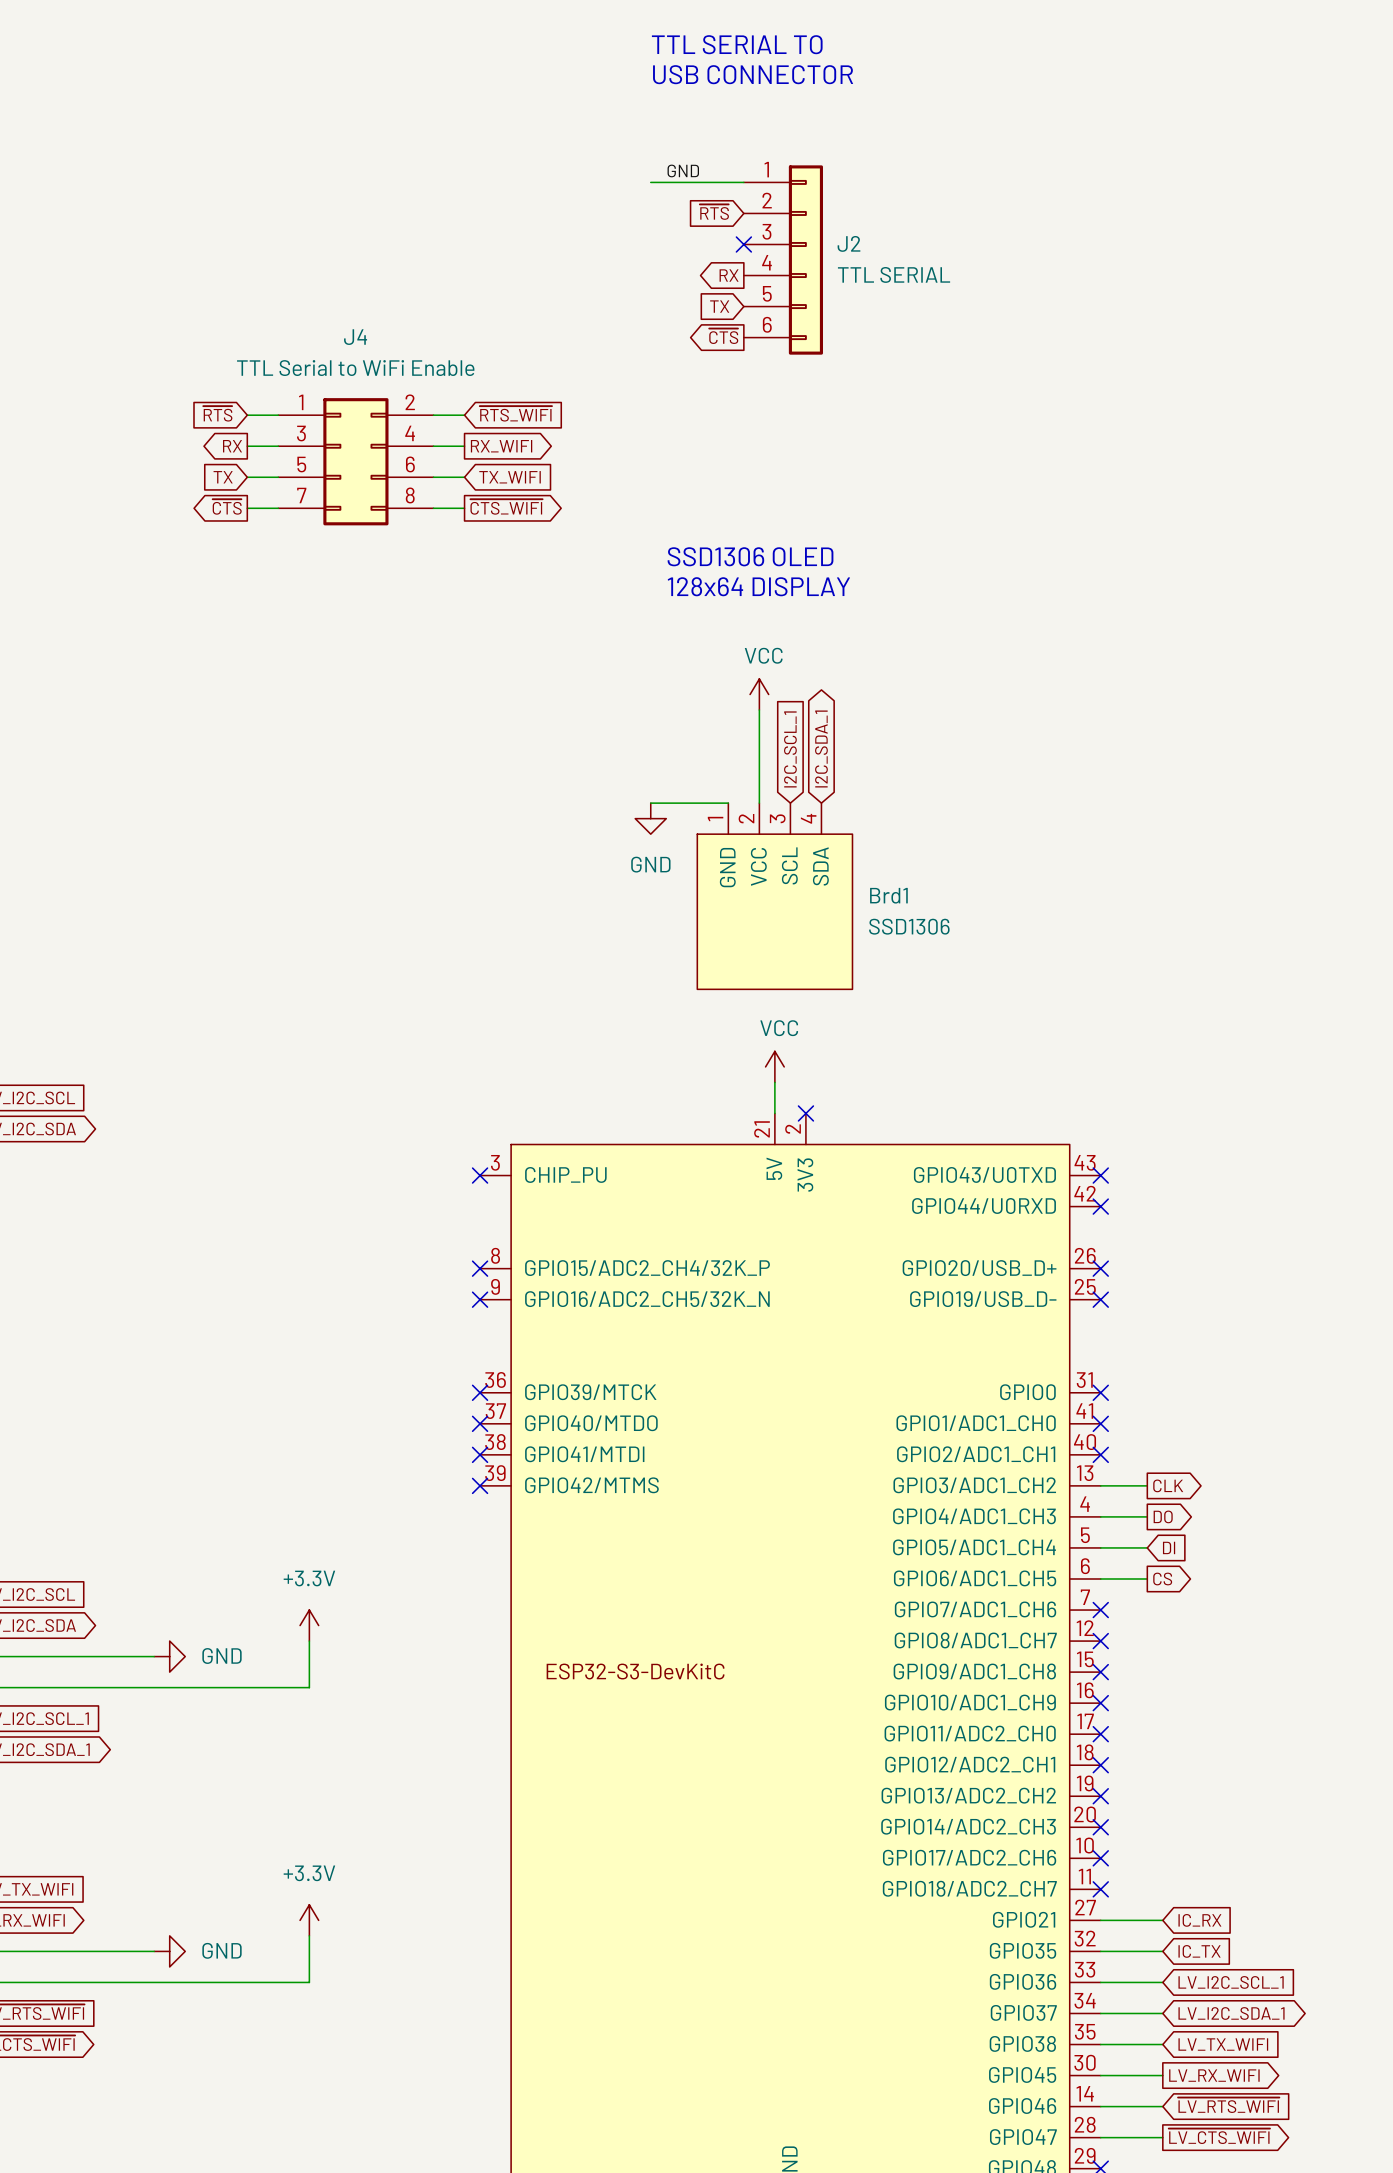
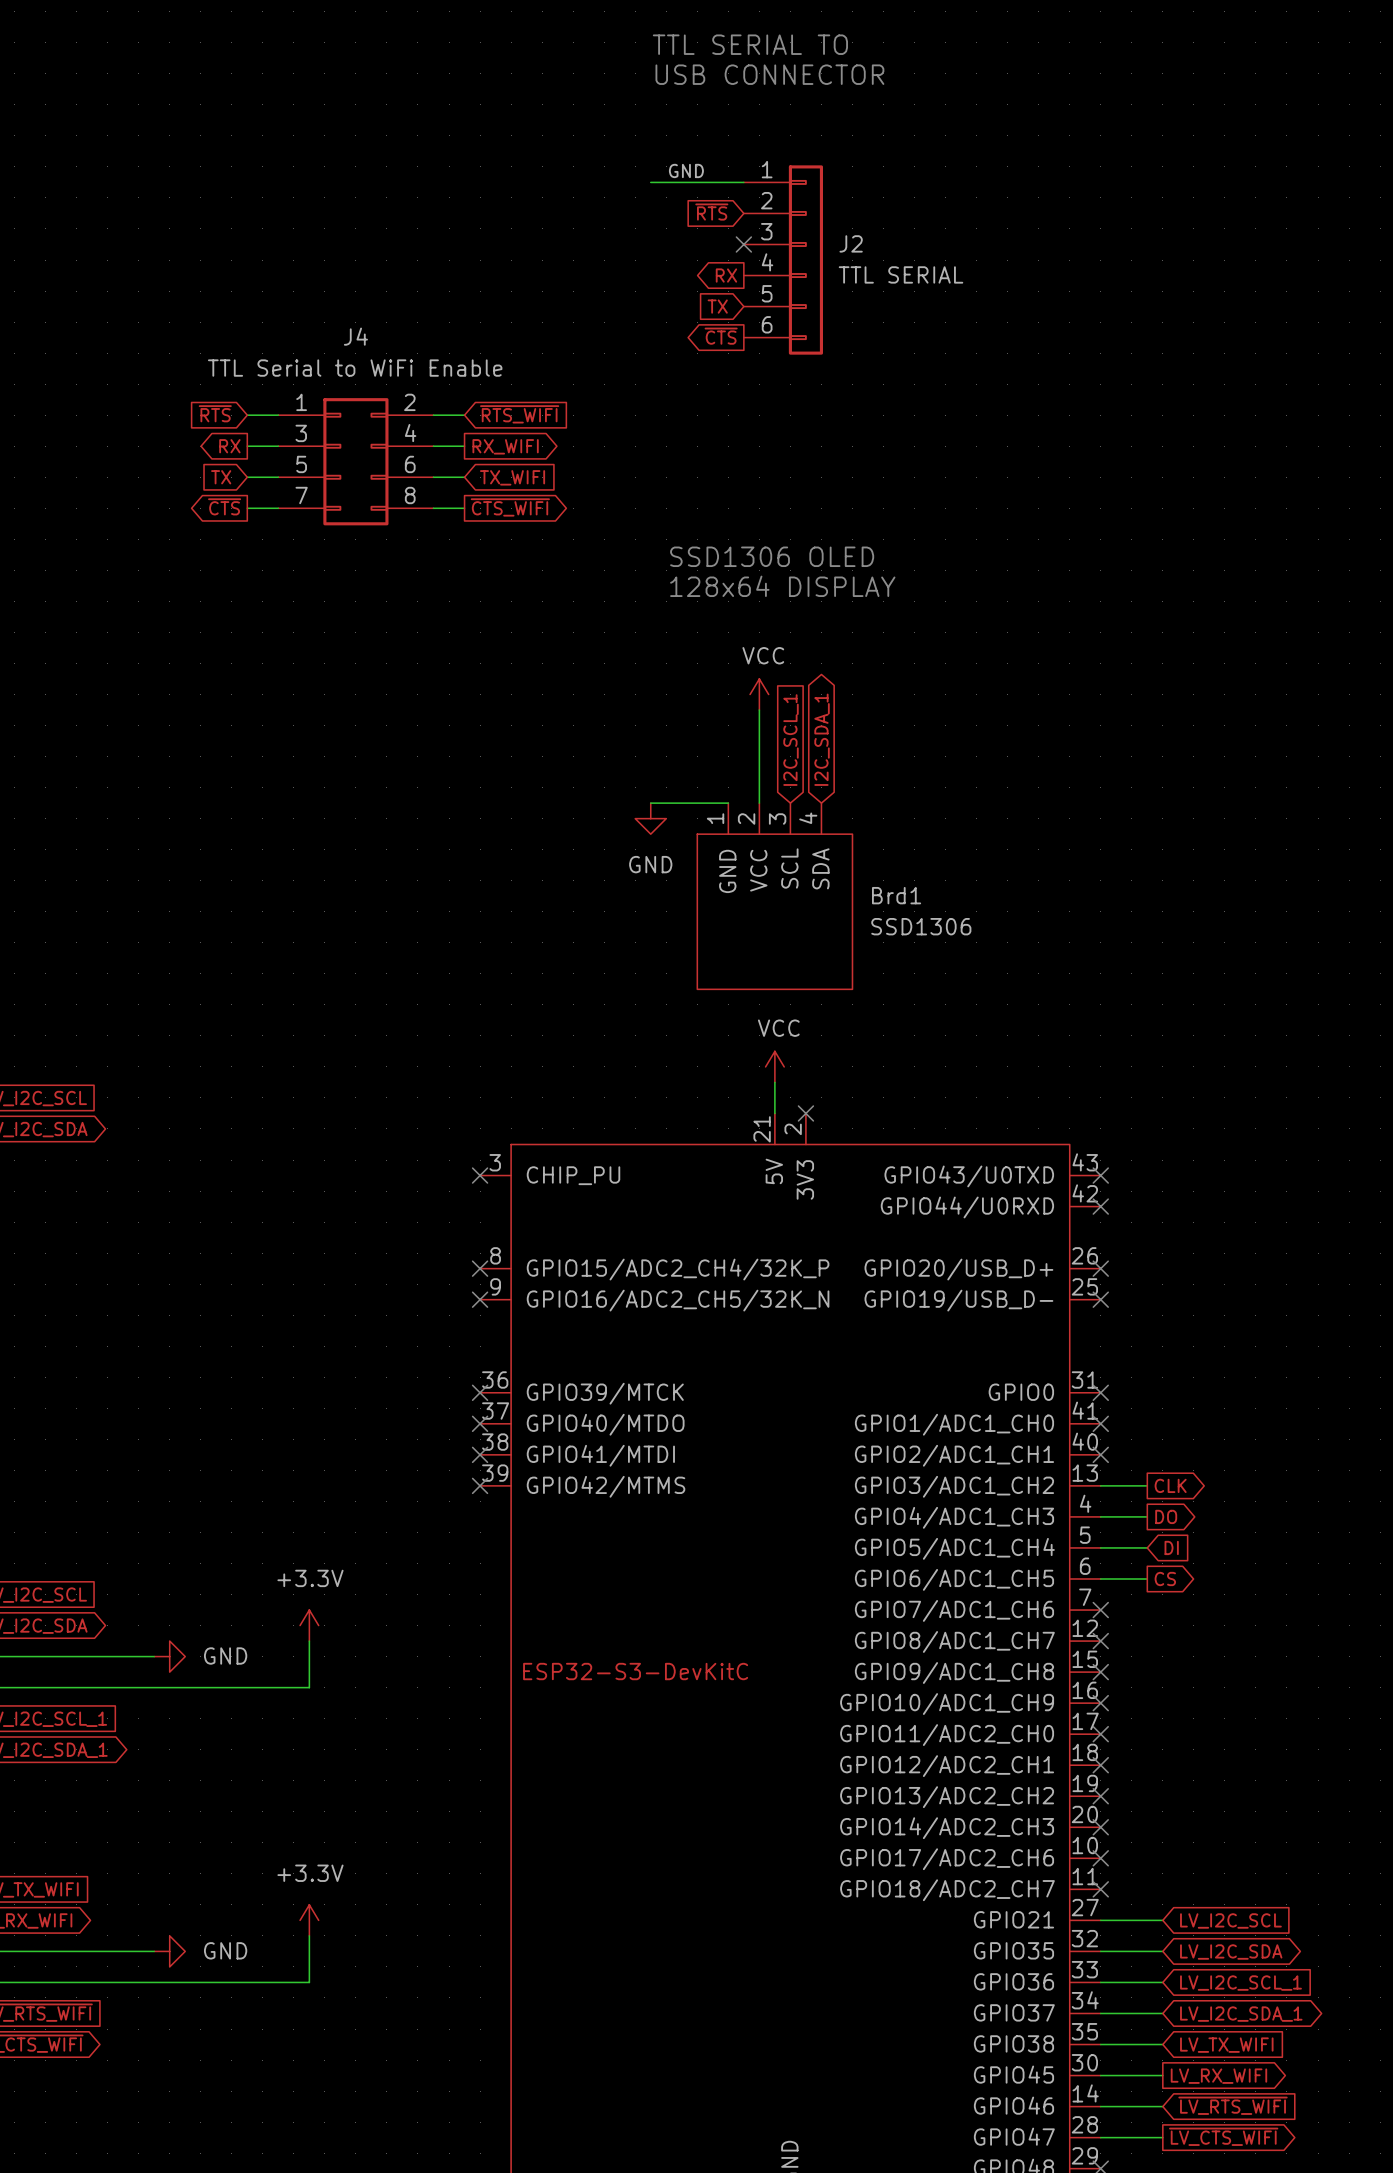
global label: IC_RX (1199, 1920) -> LV_I2C_SCL (1230, 1920)
global label shape: input (1199, 1951) -> bidirectional (1231, 1952)
global label: IC_TX (1199, 1951) -> LV_I2C_SDA (1231, 1952)

